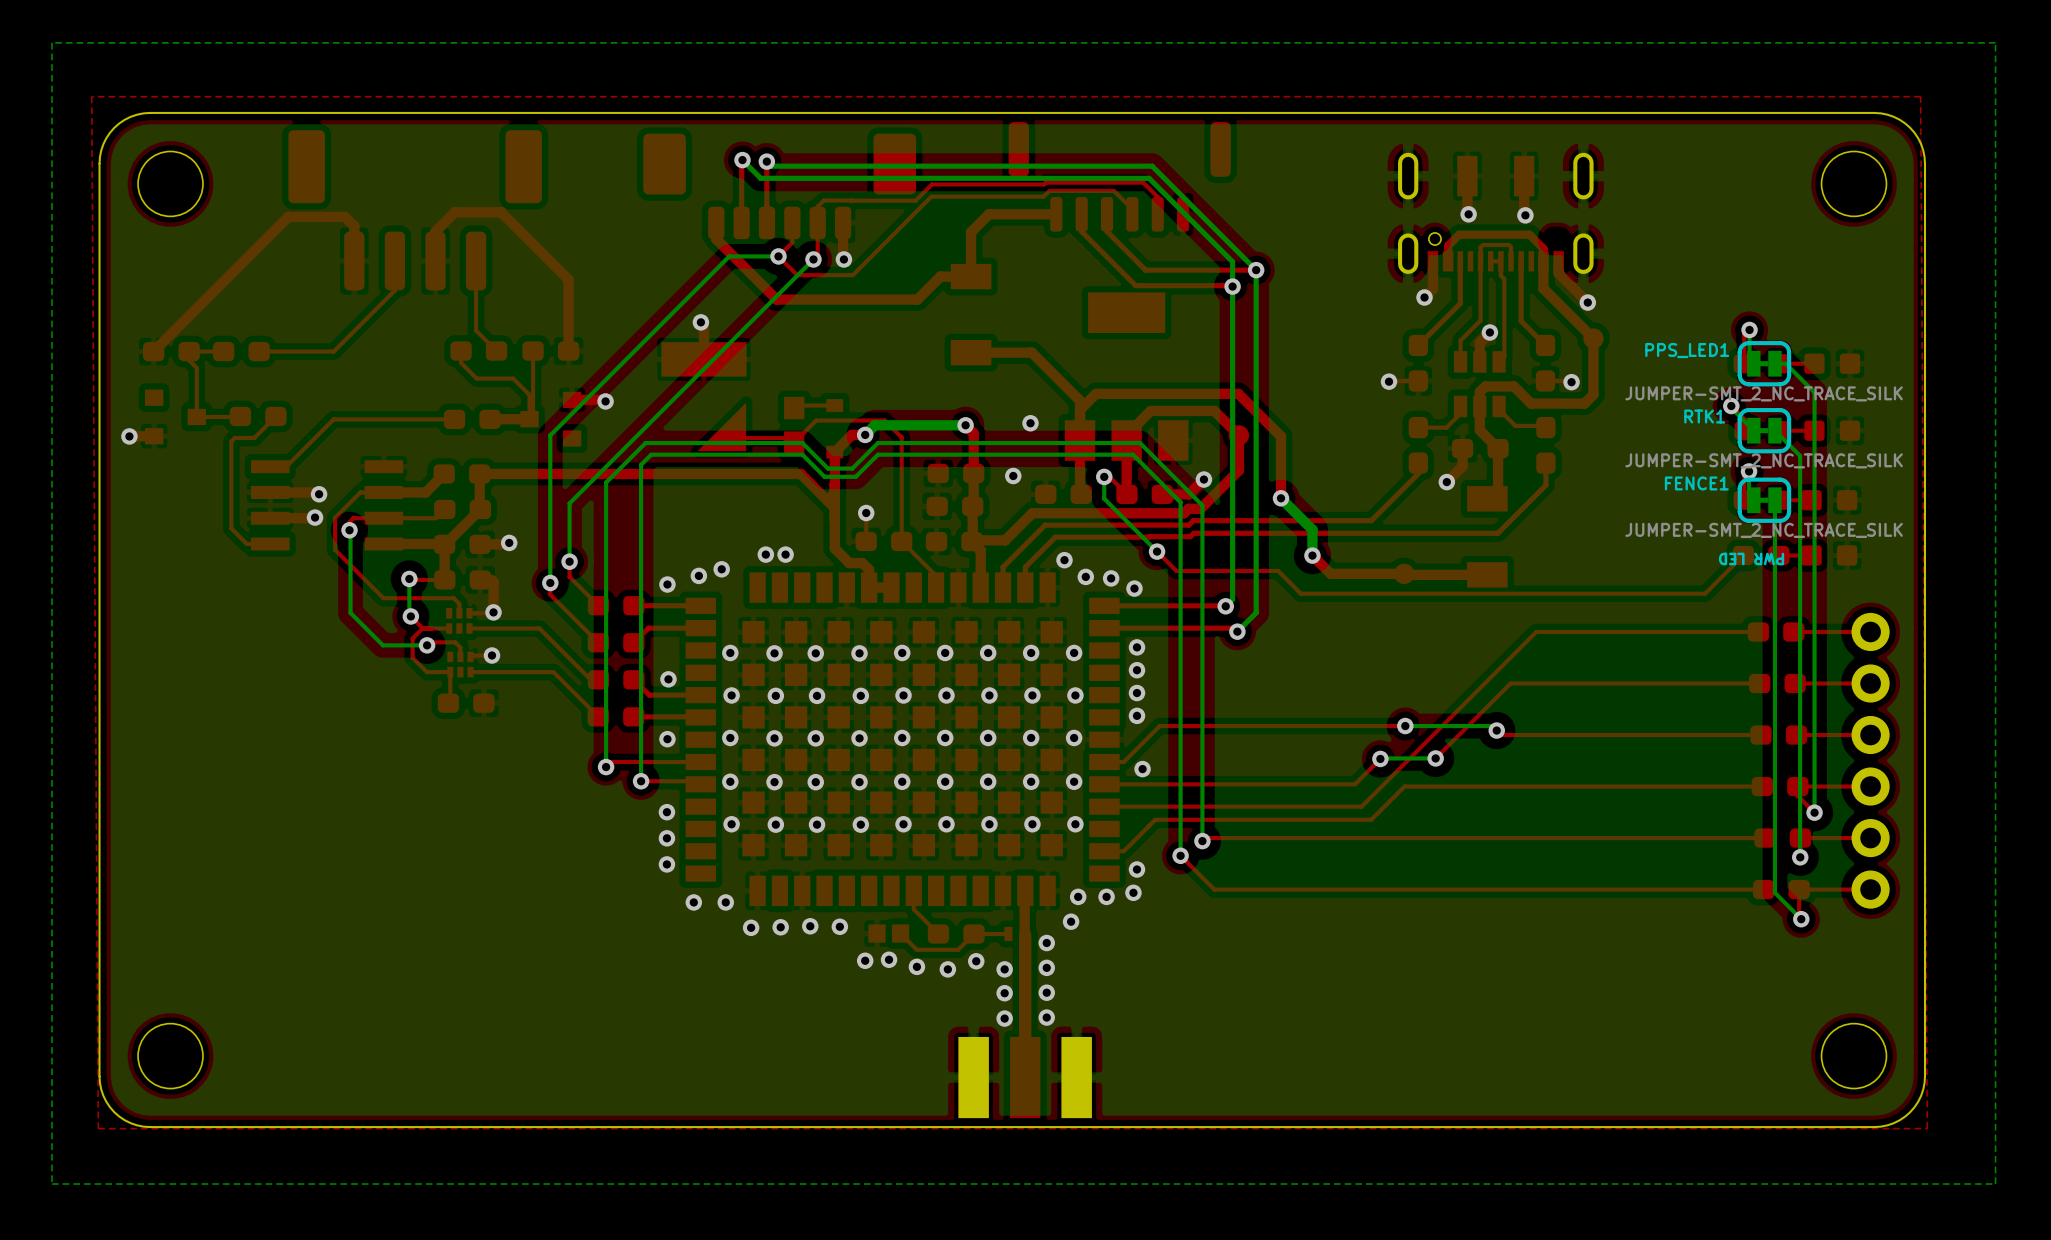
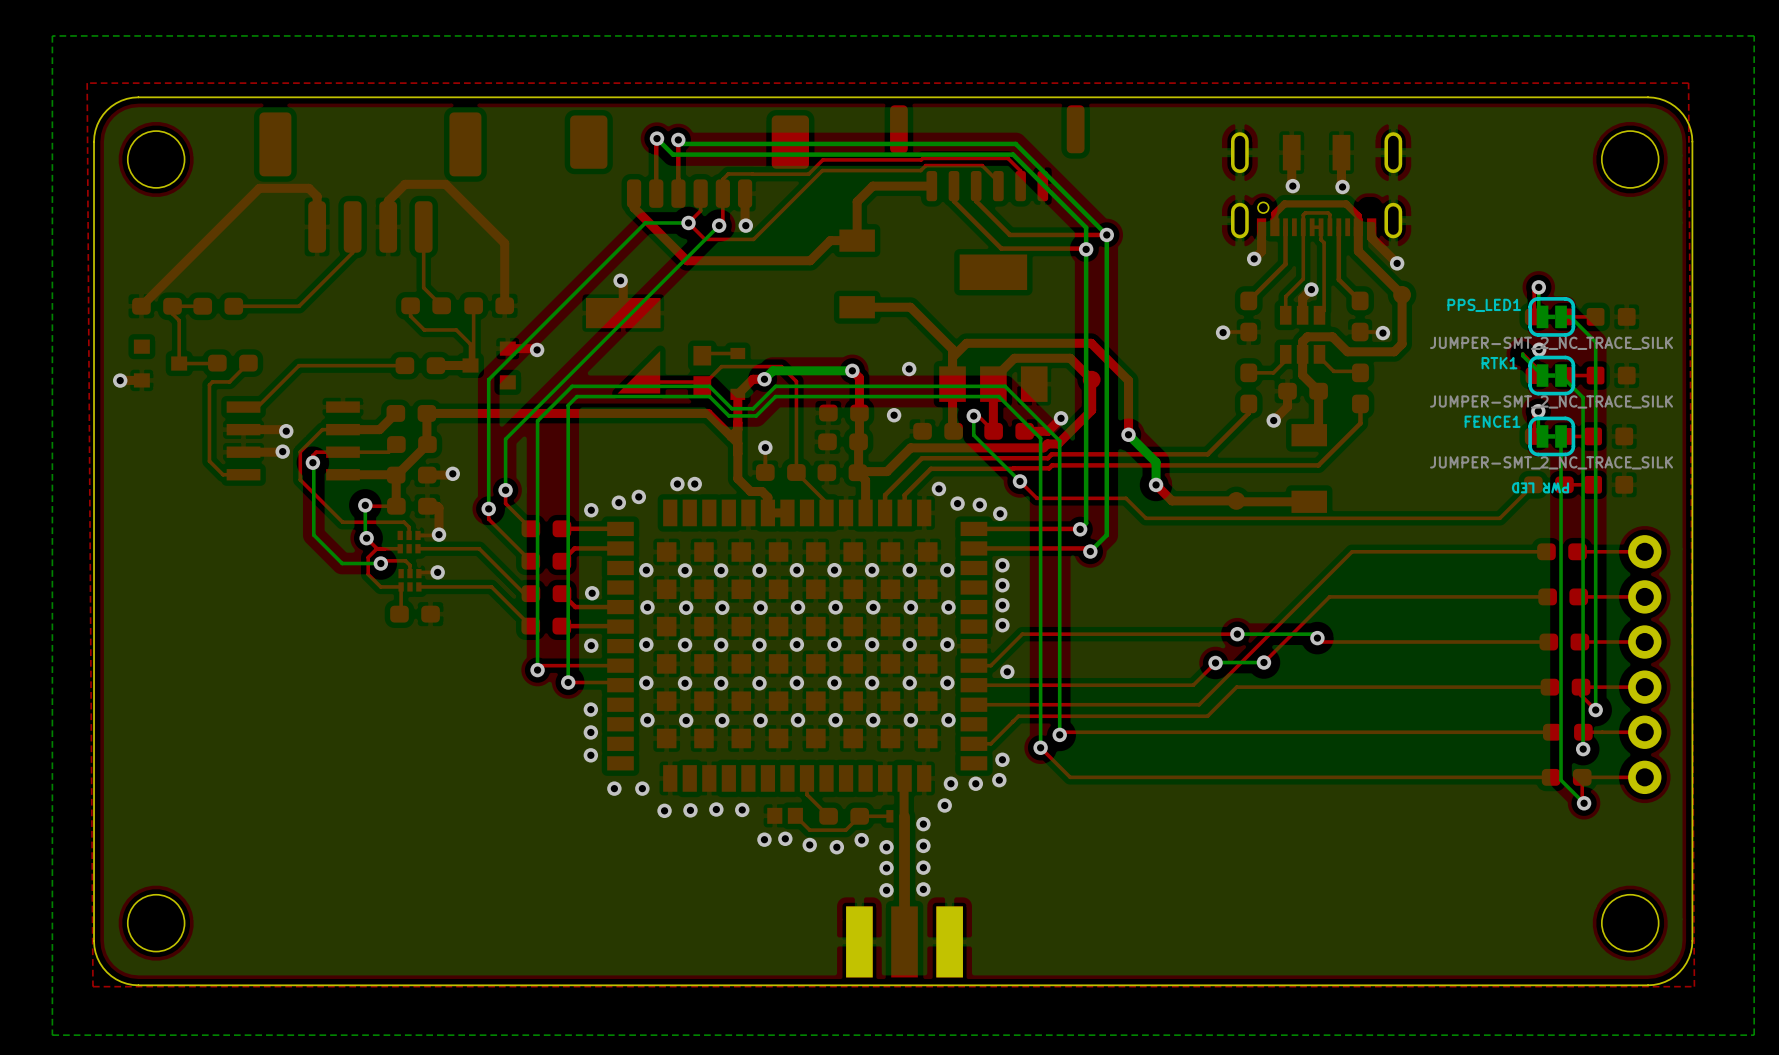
via position: (1731, 406) -> (1539, 349)

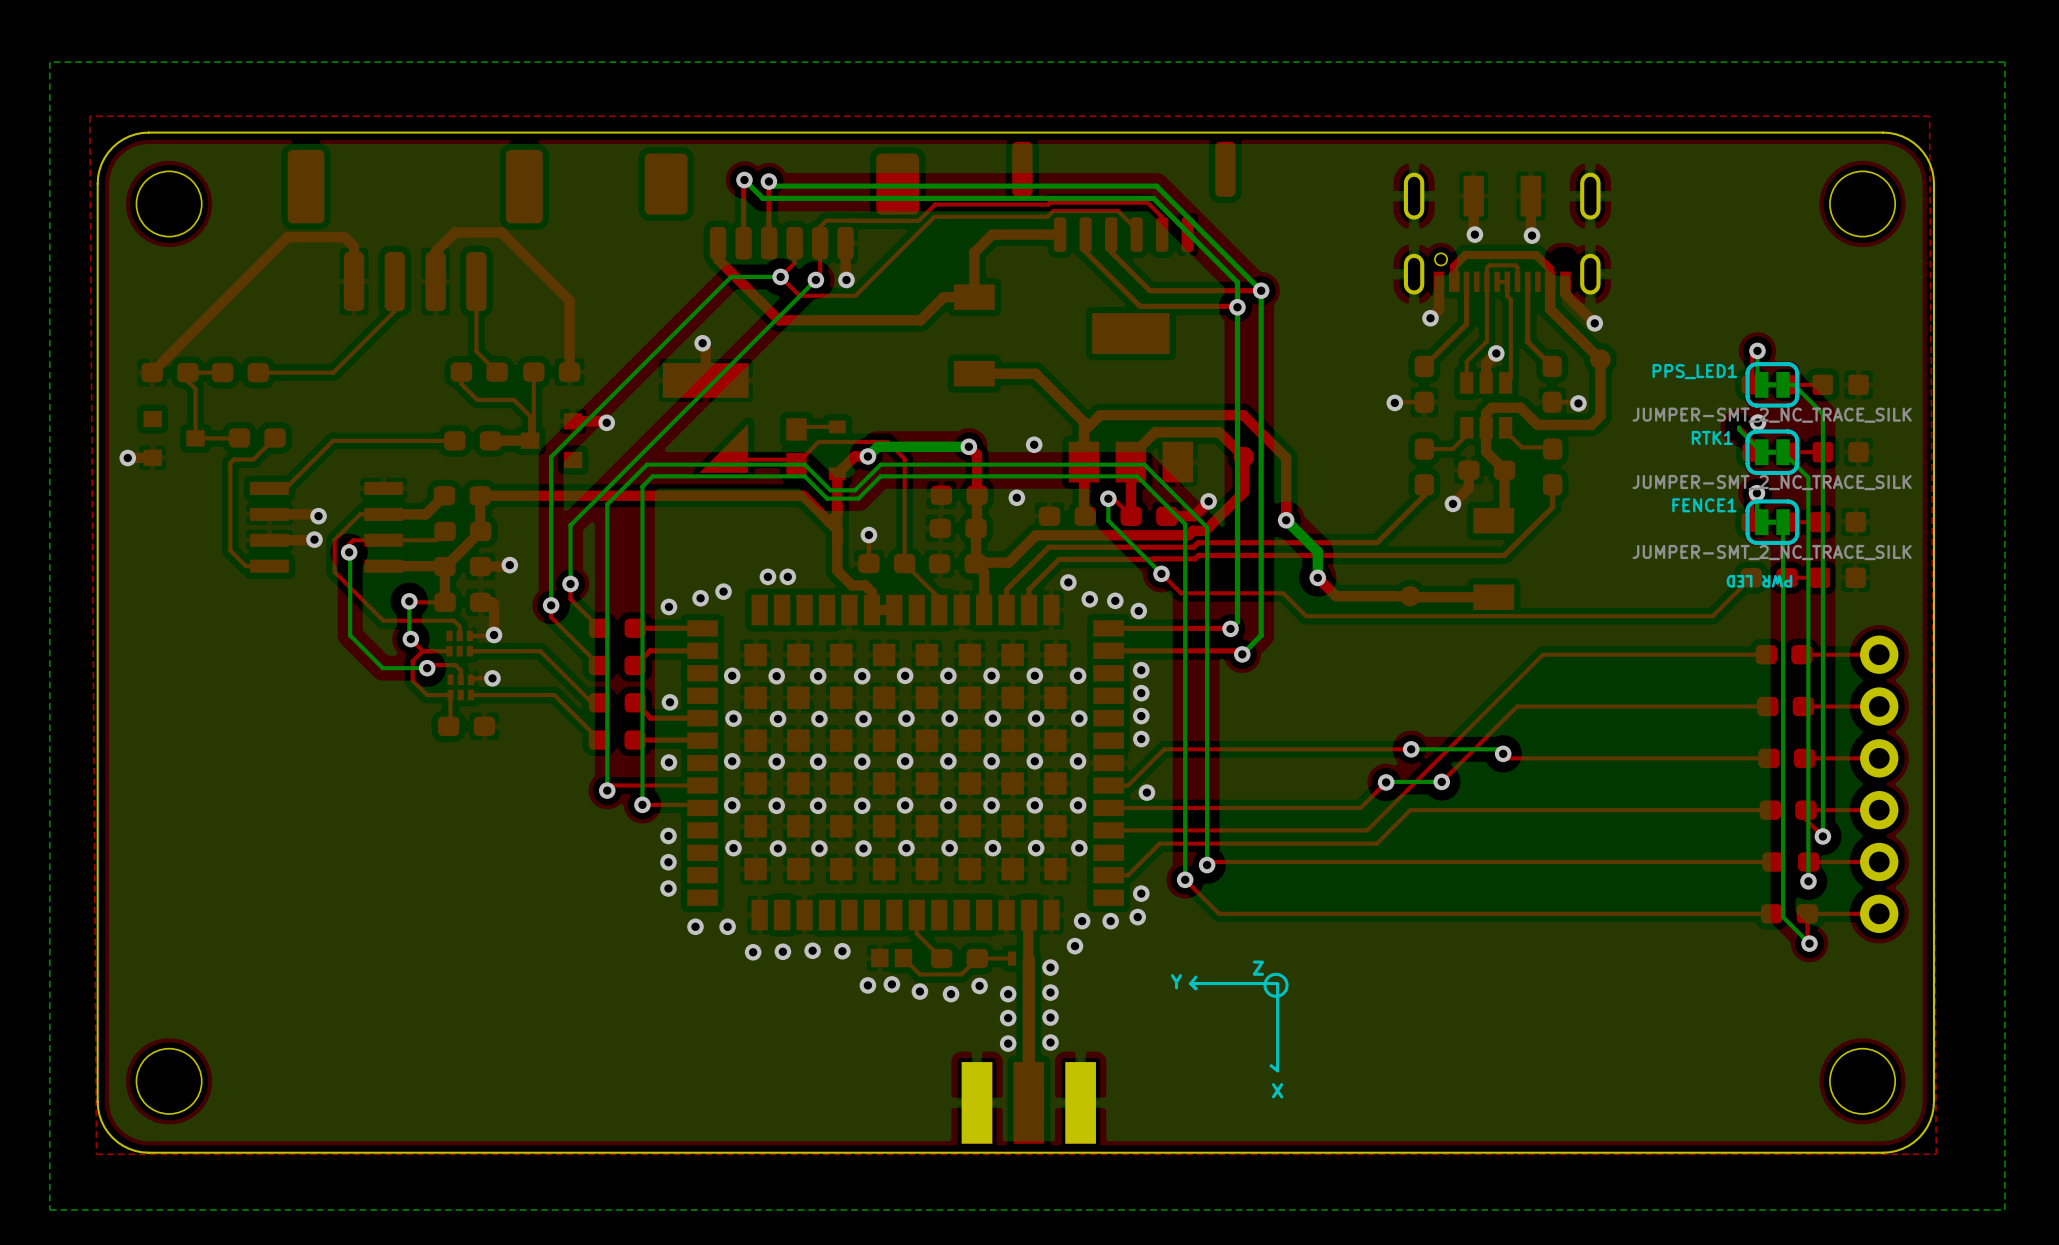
text: none -> Z (1258, 968)
drawing: none -> [1263, 972, 1289, 998]
line: none -> (1195, 977) (1190, 983)
text: none -> Y (1176, 981)
line: none -> (1277, 983) (1190, 983)
line: none -> (1277, 984) (1277, 1070) (1271, 1065)
text: none -> X (1277, 1090)

